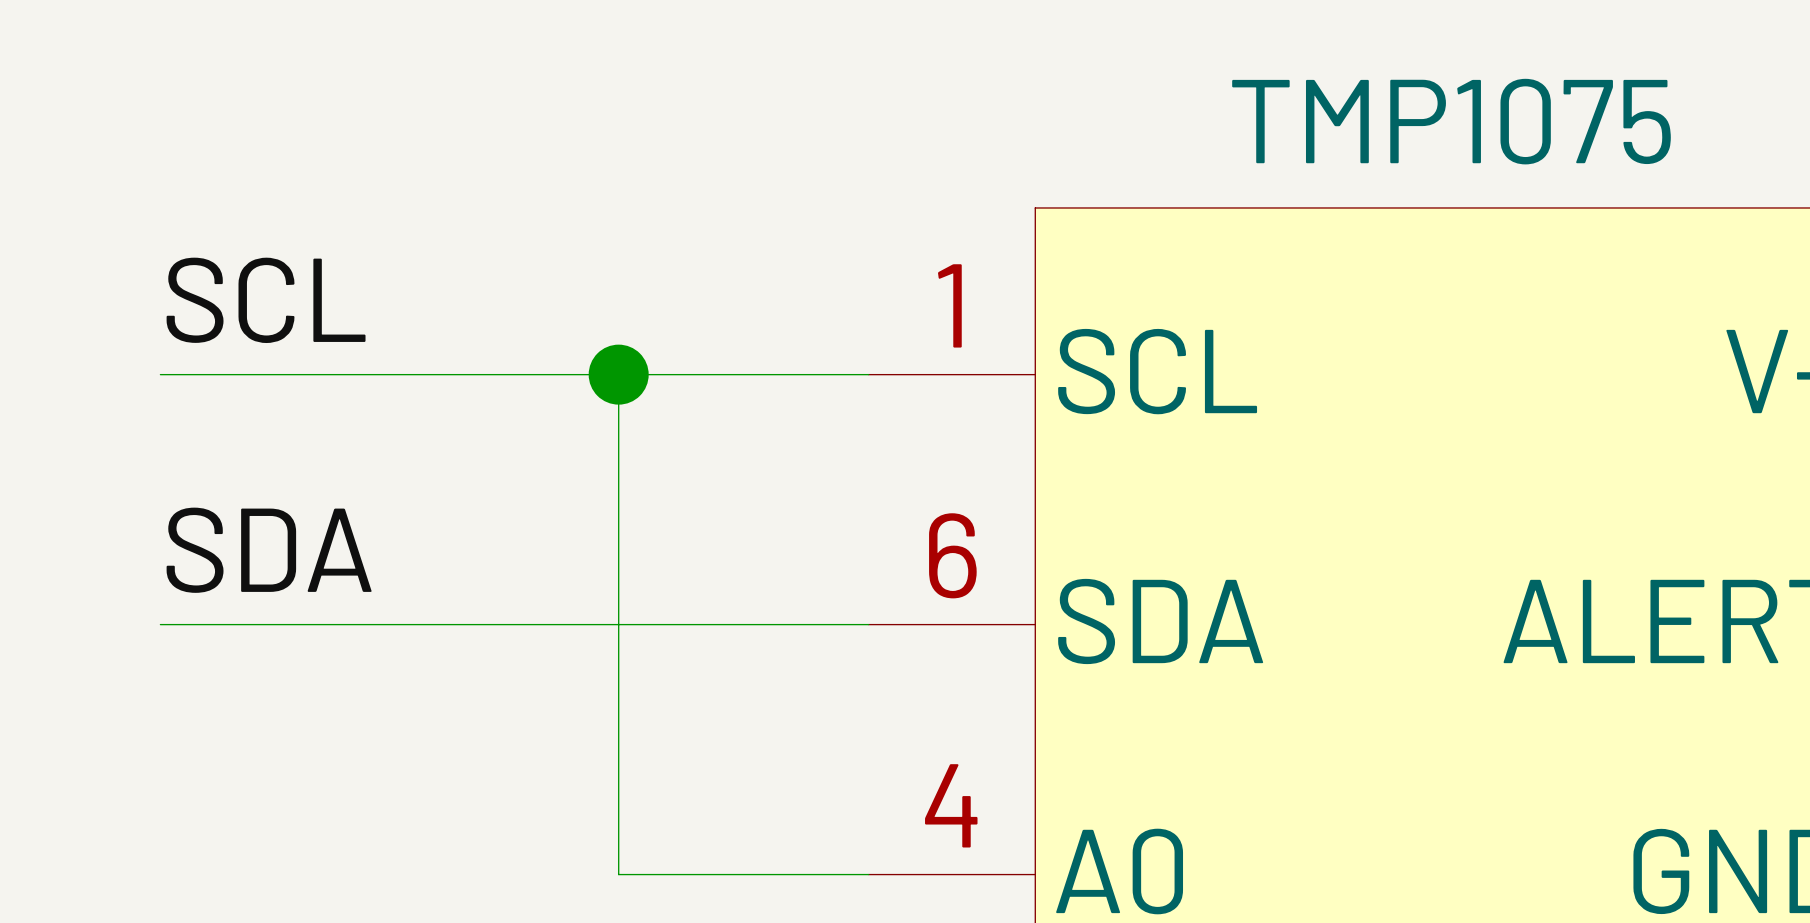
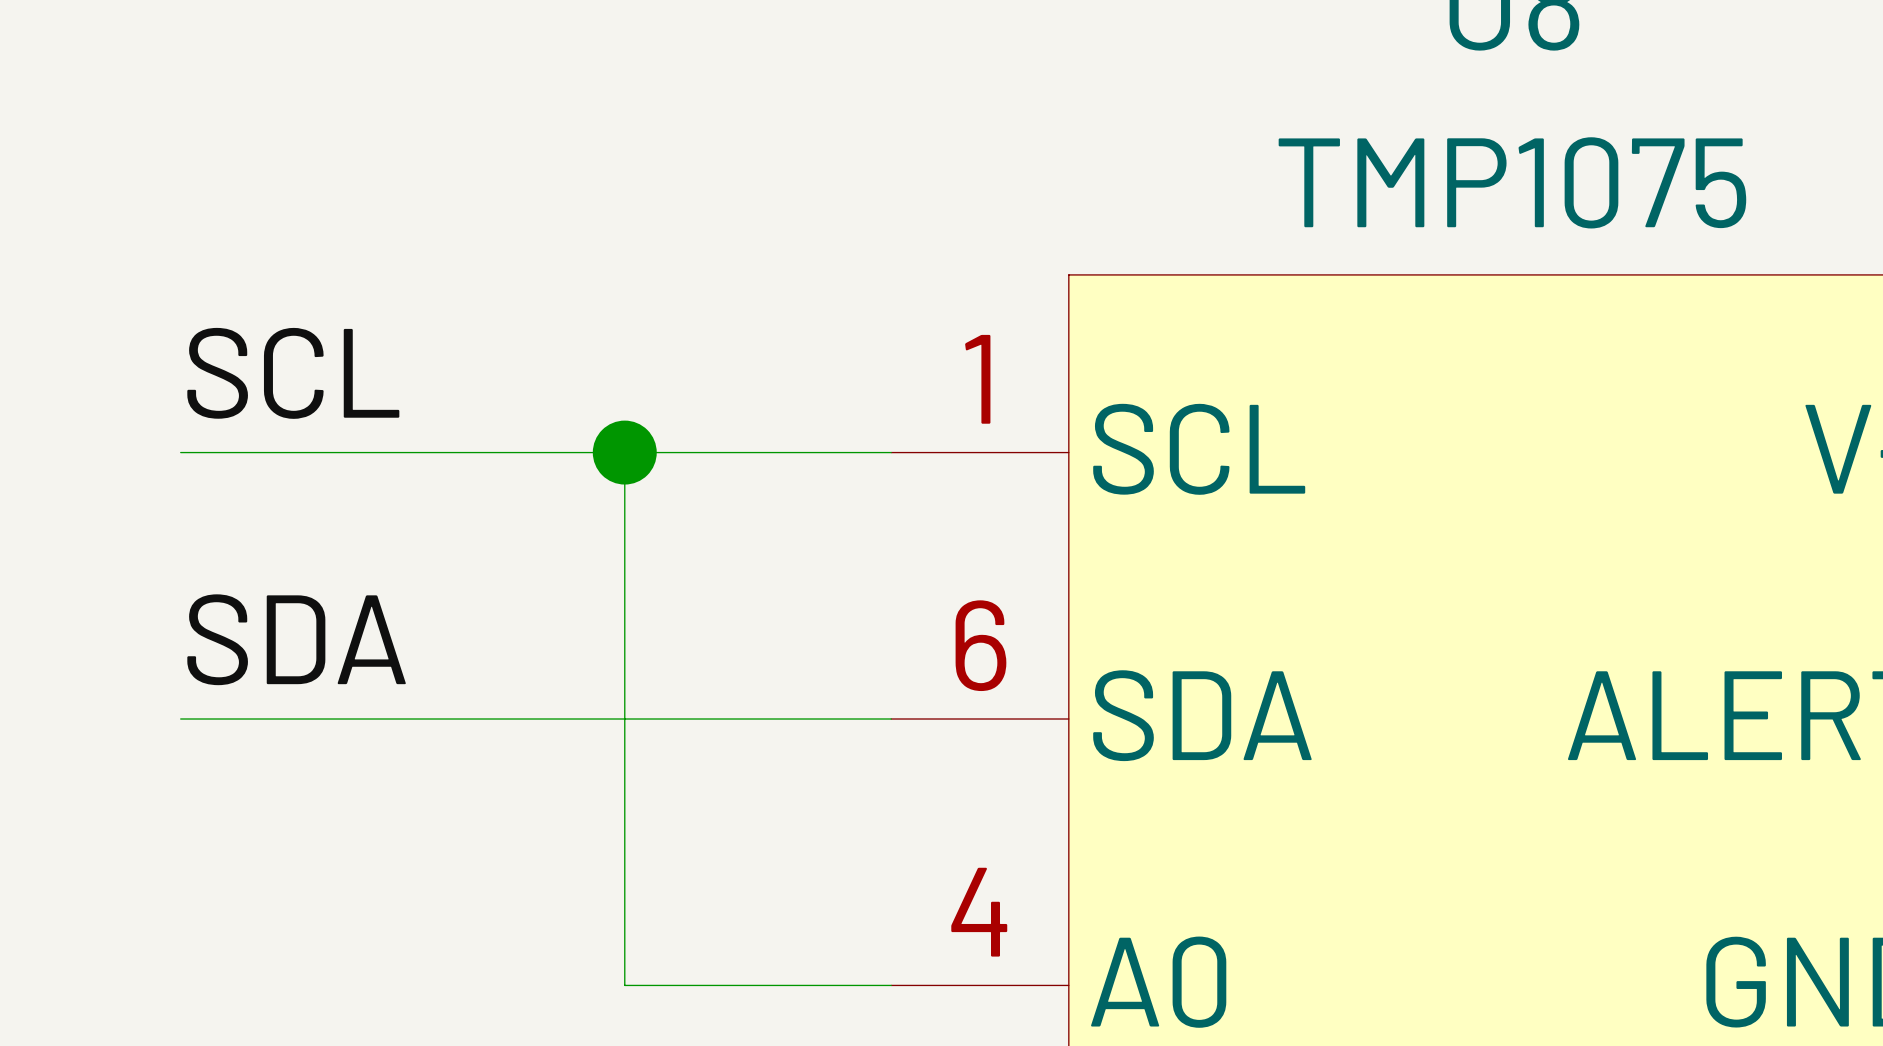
label position: SCL (266, 300) -> SCL (293, 373)
wire: (160, 374) (202, 374) -> none
label position: SDA (269, 550) -> SDA (296, 639)
wire: (160, 624) (202, 624) -> none

